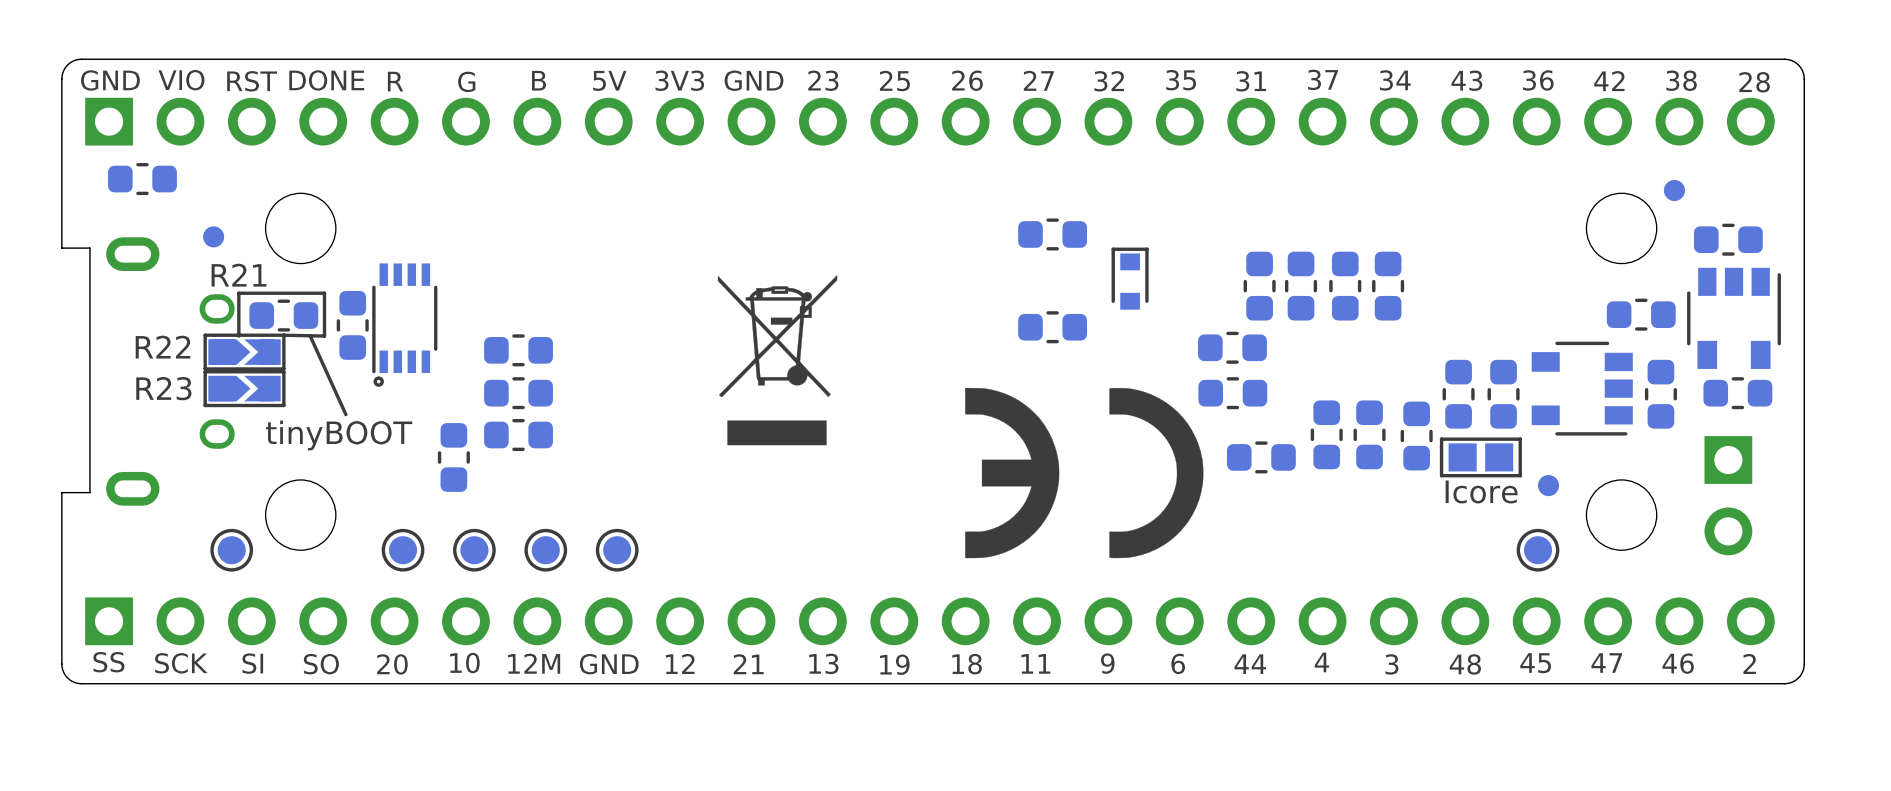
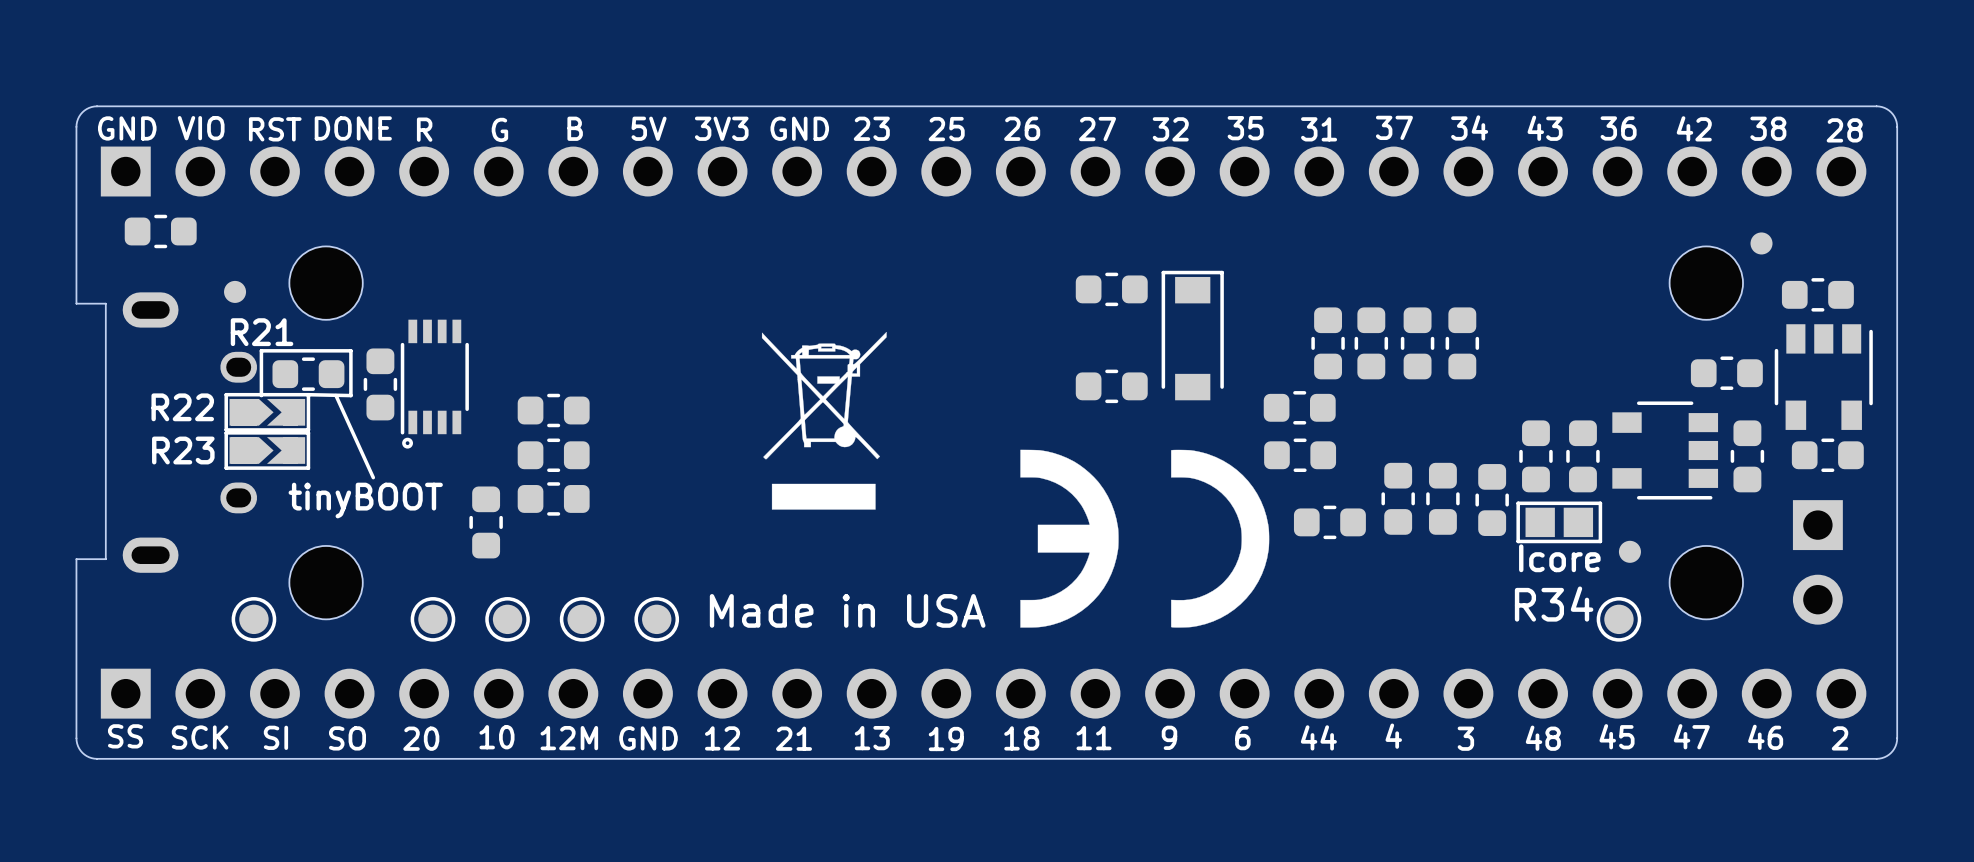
part footprint: [1111, 247, 1149, 310] -> [1161, 270, 1224, 401]
R34 name: none -> R34 (1554, 604)
text: none -> Made in USA (847, 610)

